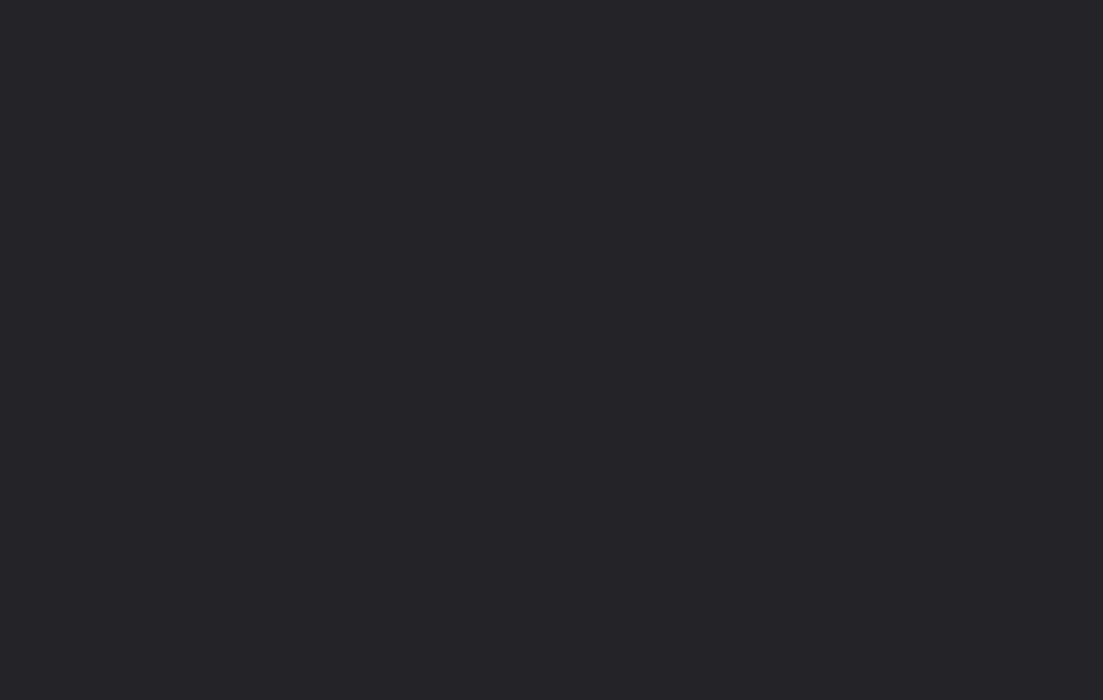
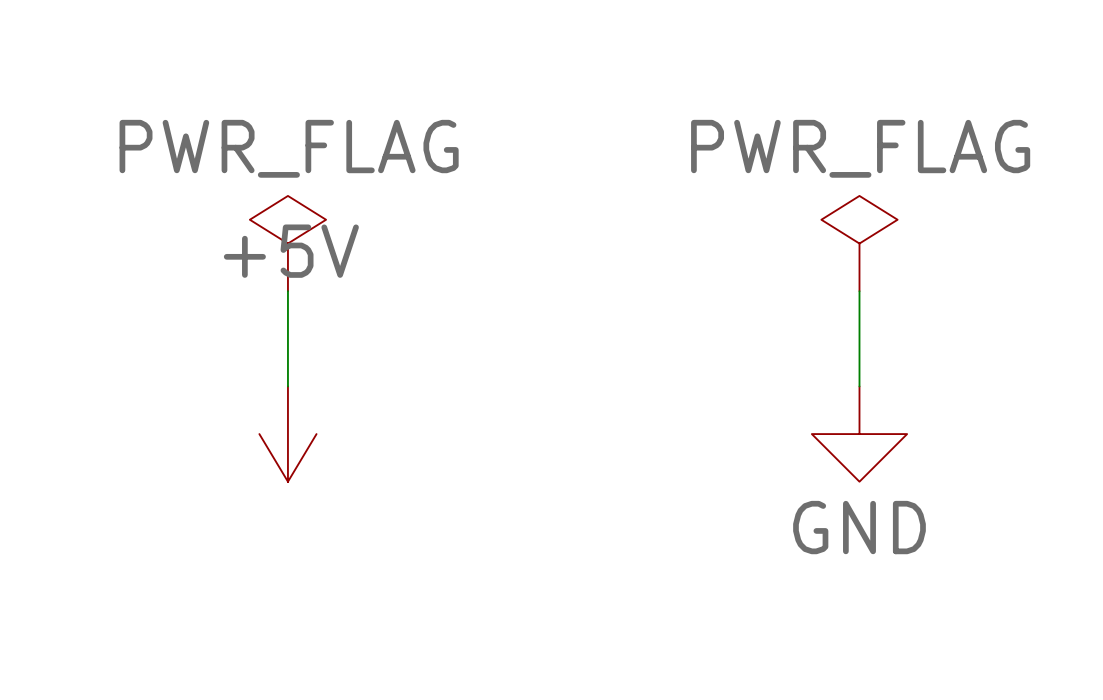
power symbol: none -> PWR_FLAG (287, 243)
power symbol: none -> PWR_FLAG (859, 243)
wire: none -> (287, 291) (287, 386)
wire: none -> (859, 291) (859, 386)
power symbol: none -> +5V (287, 434)
power symbol: none -> GND (859, 434)

